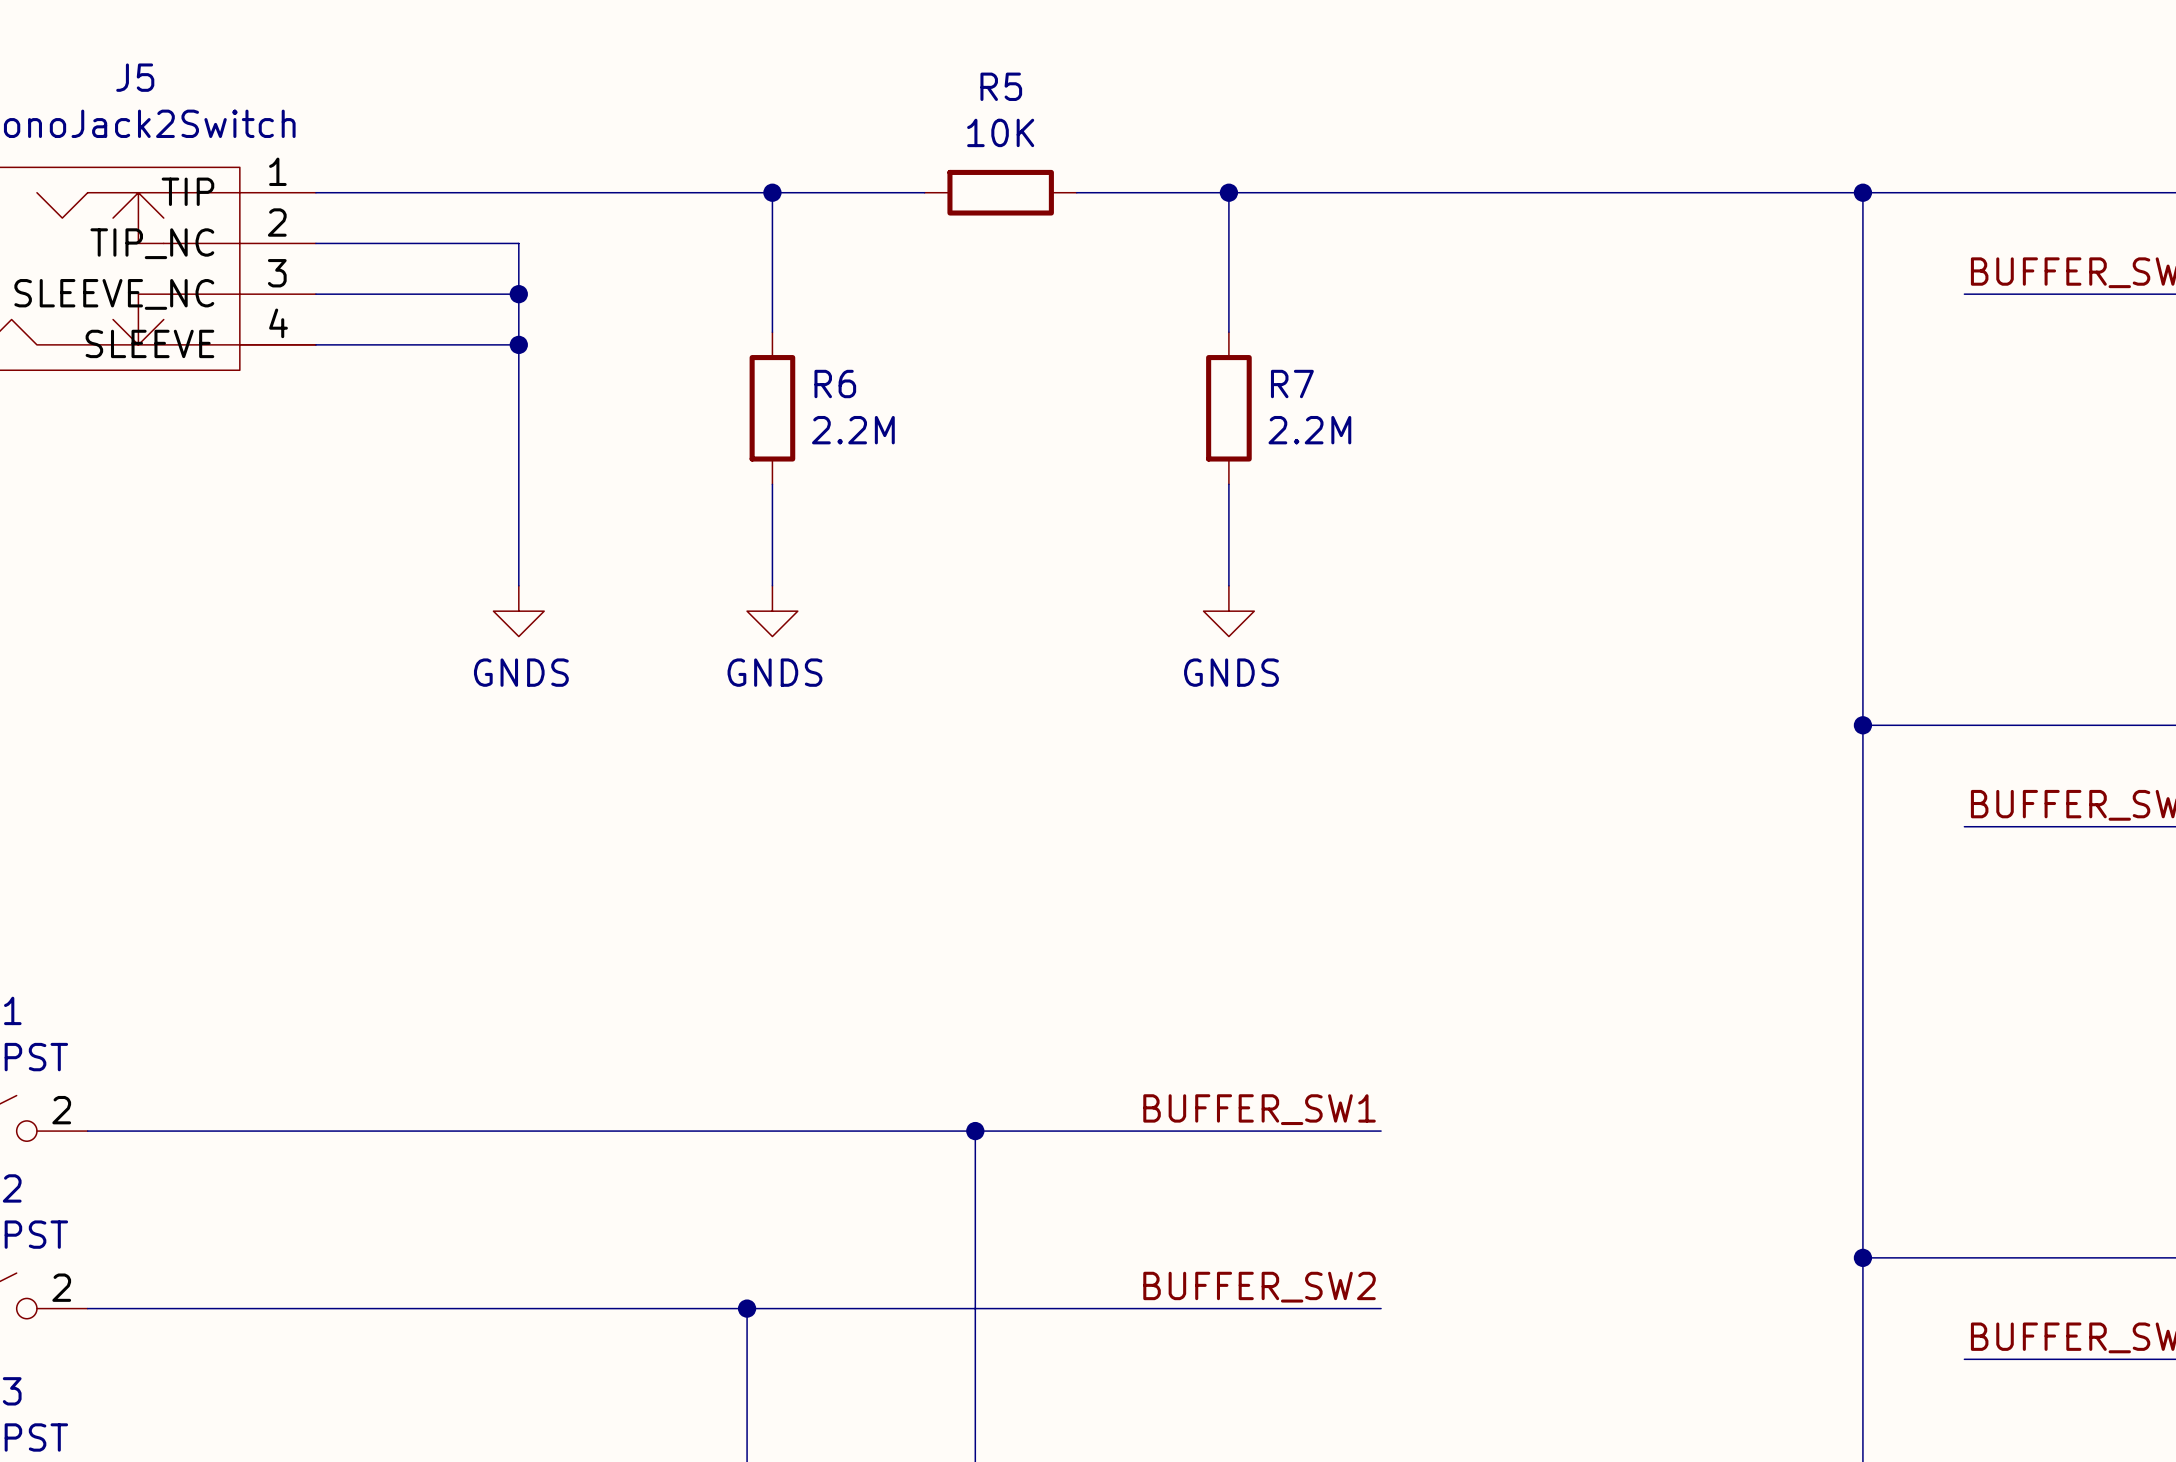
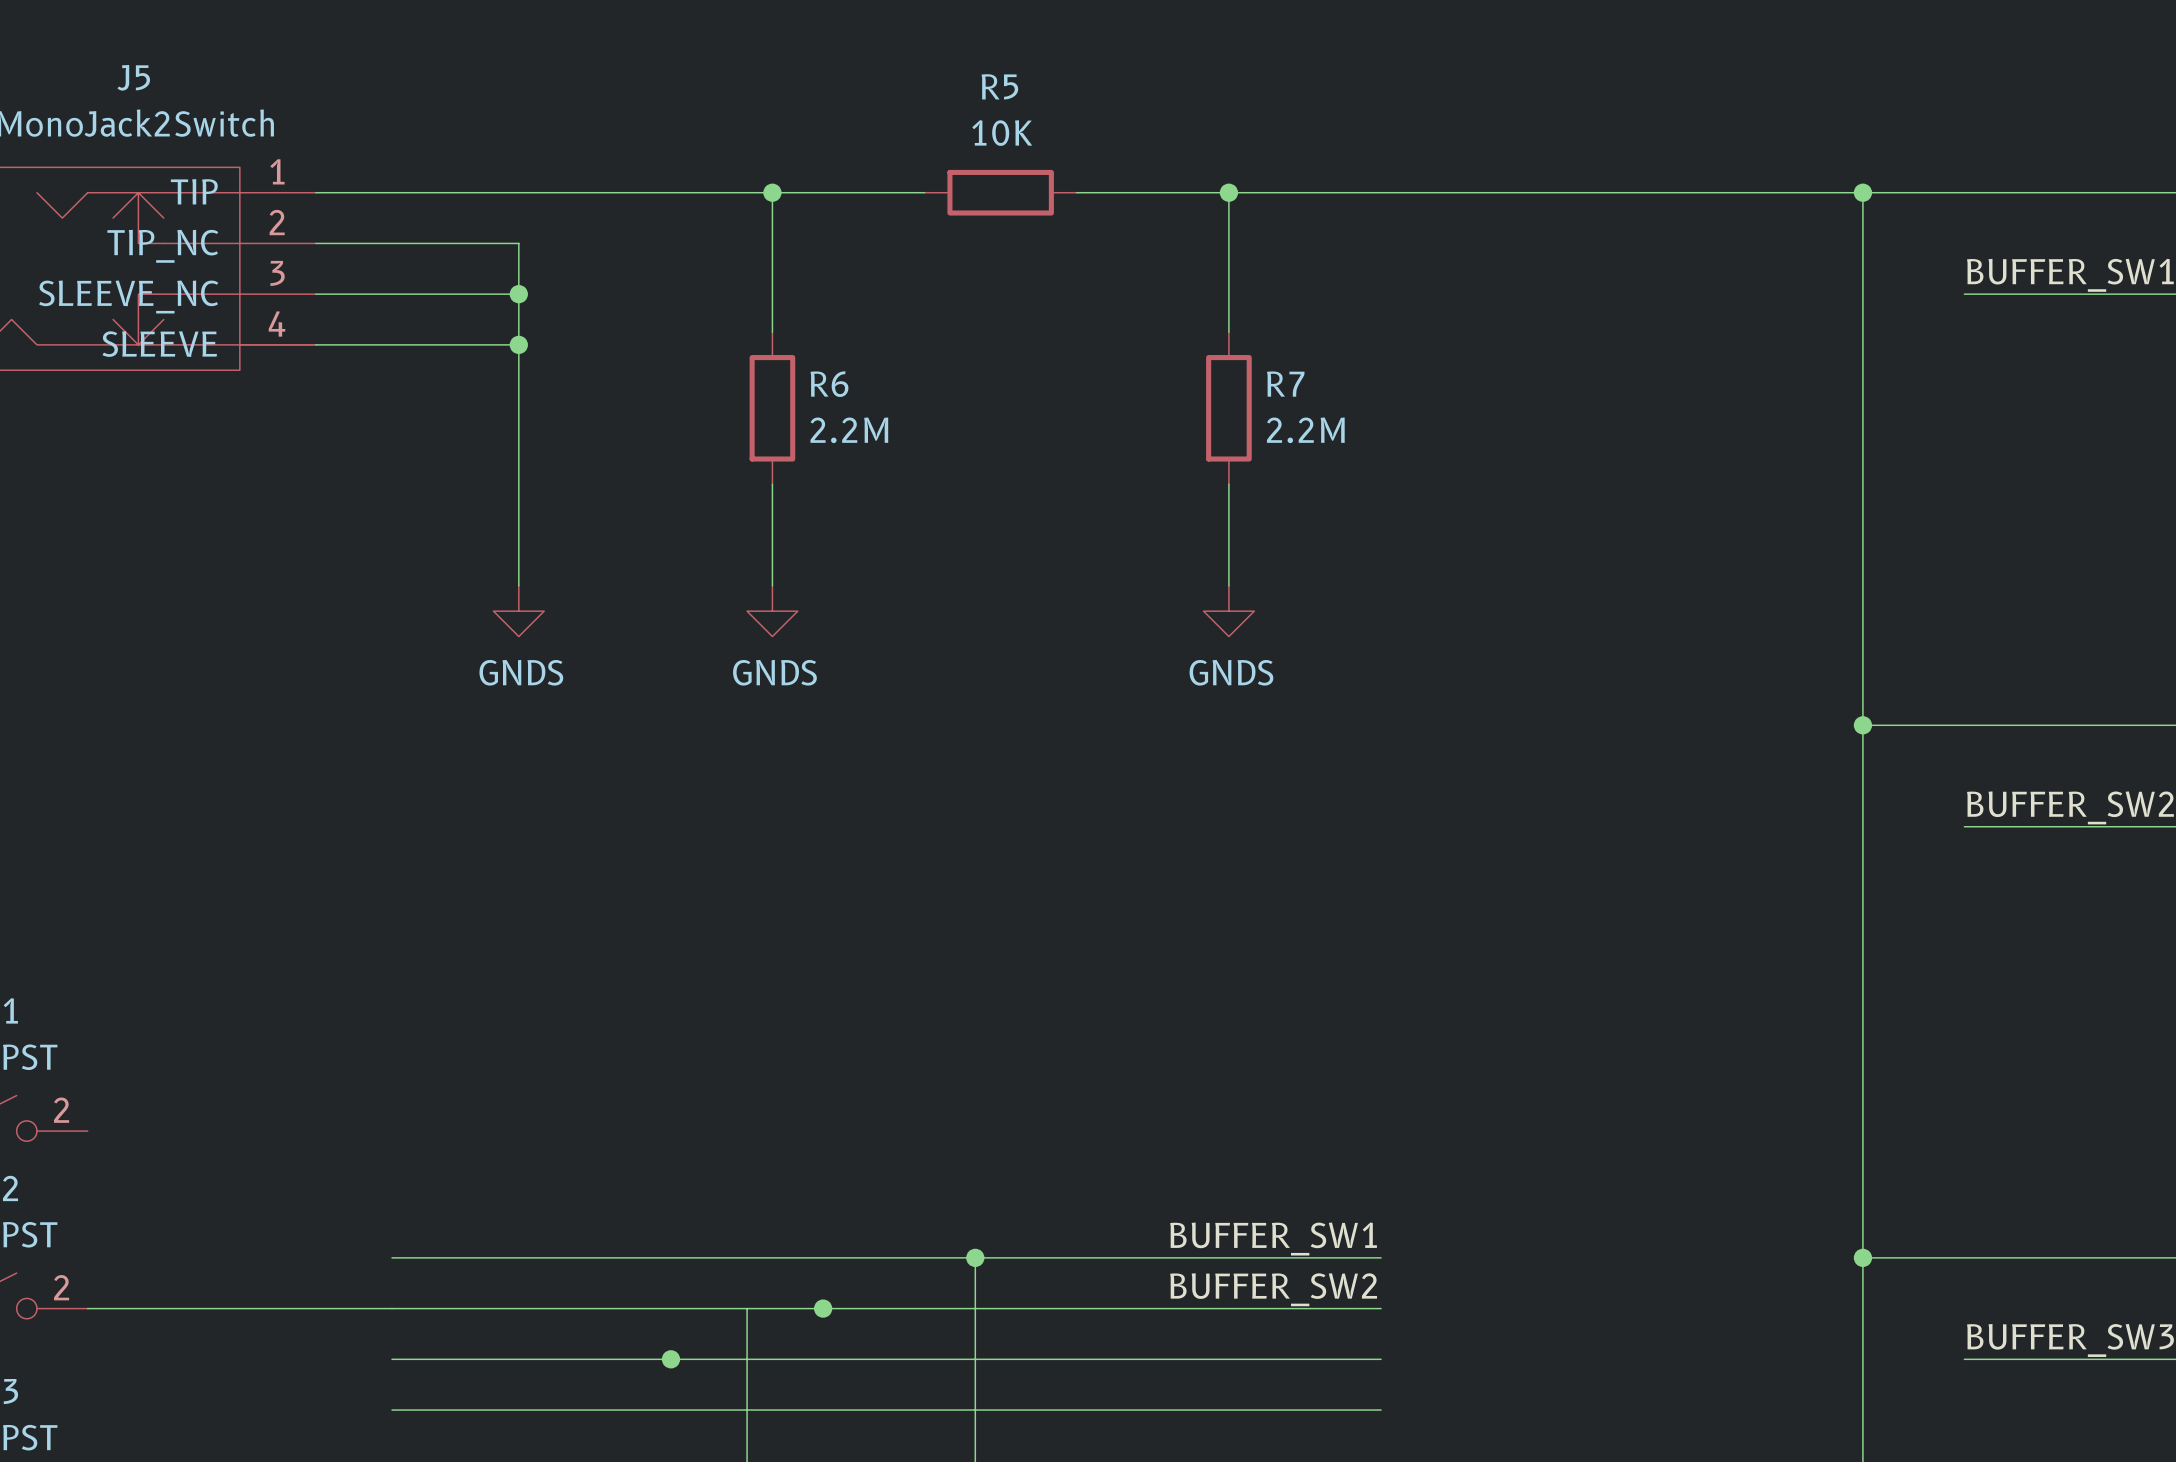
label position: BUFFER_SW1 (1259, 1109) -> BUFFER_SW1 (1273, 1239)
wire: (87, 1131) (1381, 1131) -> none
wire: (975, 1131) (975, 1257) -> none
junction: (975, 1131) -> none
wire: none -> (392, 1257) (1381, 1257)
junction: none -> (975, 1257)
junction: (747, 1308) -> none
junction: none -> (823, 1308)
wire: none -> (392, 1359) (1381, 1359)
junction: none -> (670, 1359)
wire: none -> (392, 1410) (1381, 1410)

